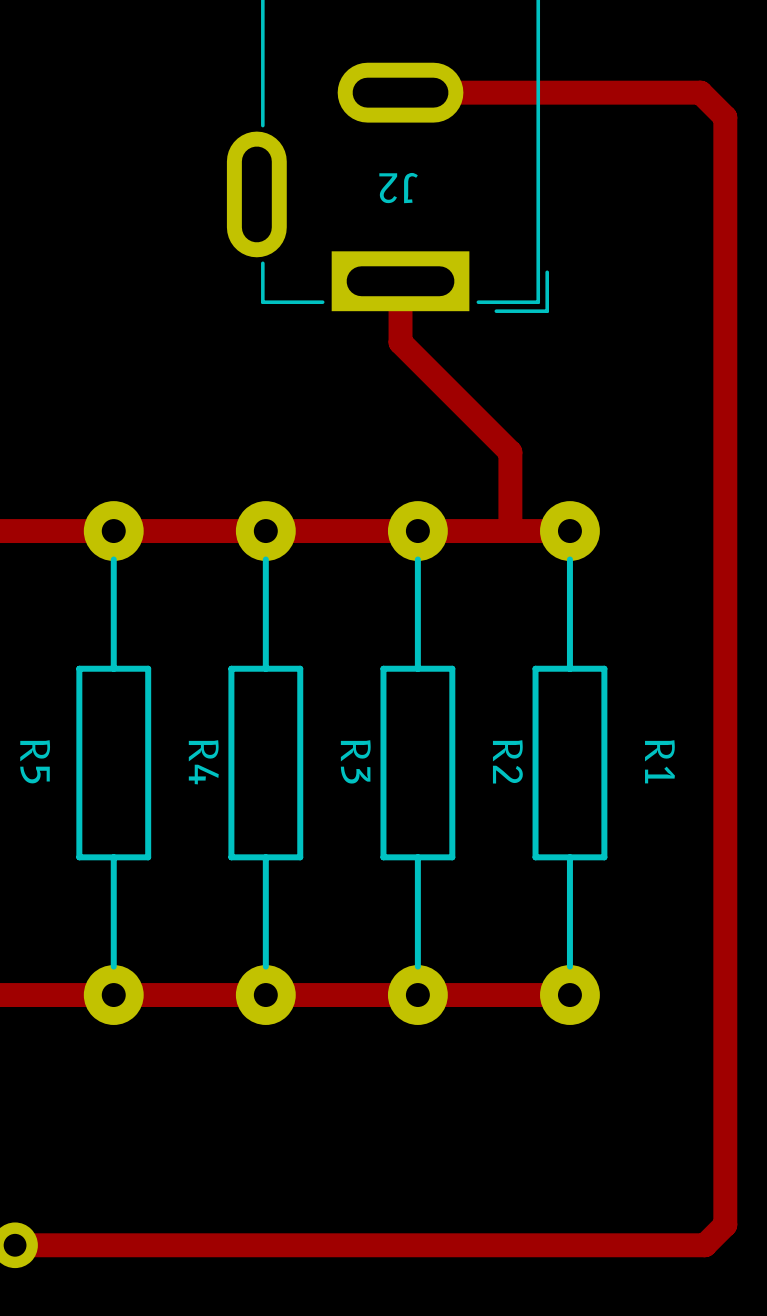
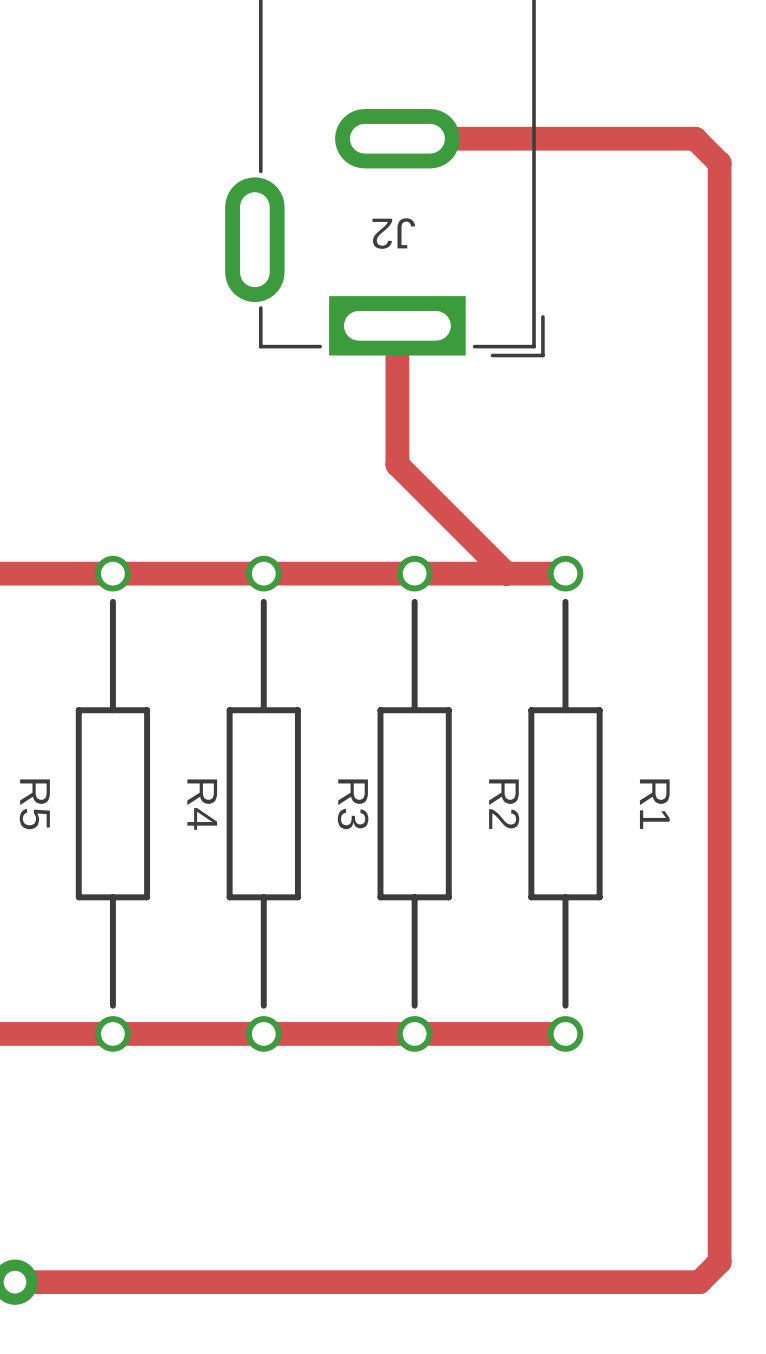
top track: (400, 342) (510, 452) (510, 531) -> (397, 386) (397, 464) (506, 573)
R4 footprint: [76, 501, 152, 1025] -> [75, 555, 151, 1052]
R3 footprint: [228, 501, 304, 1025] -> [226, 555, 301, 1052]
R2 footprint: [380, 501, 456, 1025] -> [377, 555, 452, 1052]
R1 footprint: [532, 501, 608, 1025] -> [528, 555, 603, 1052]

